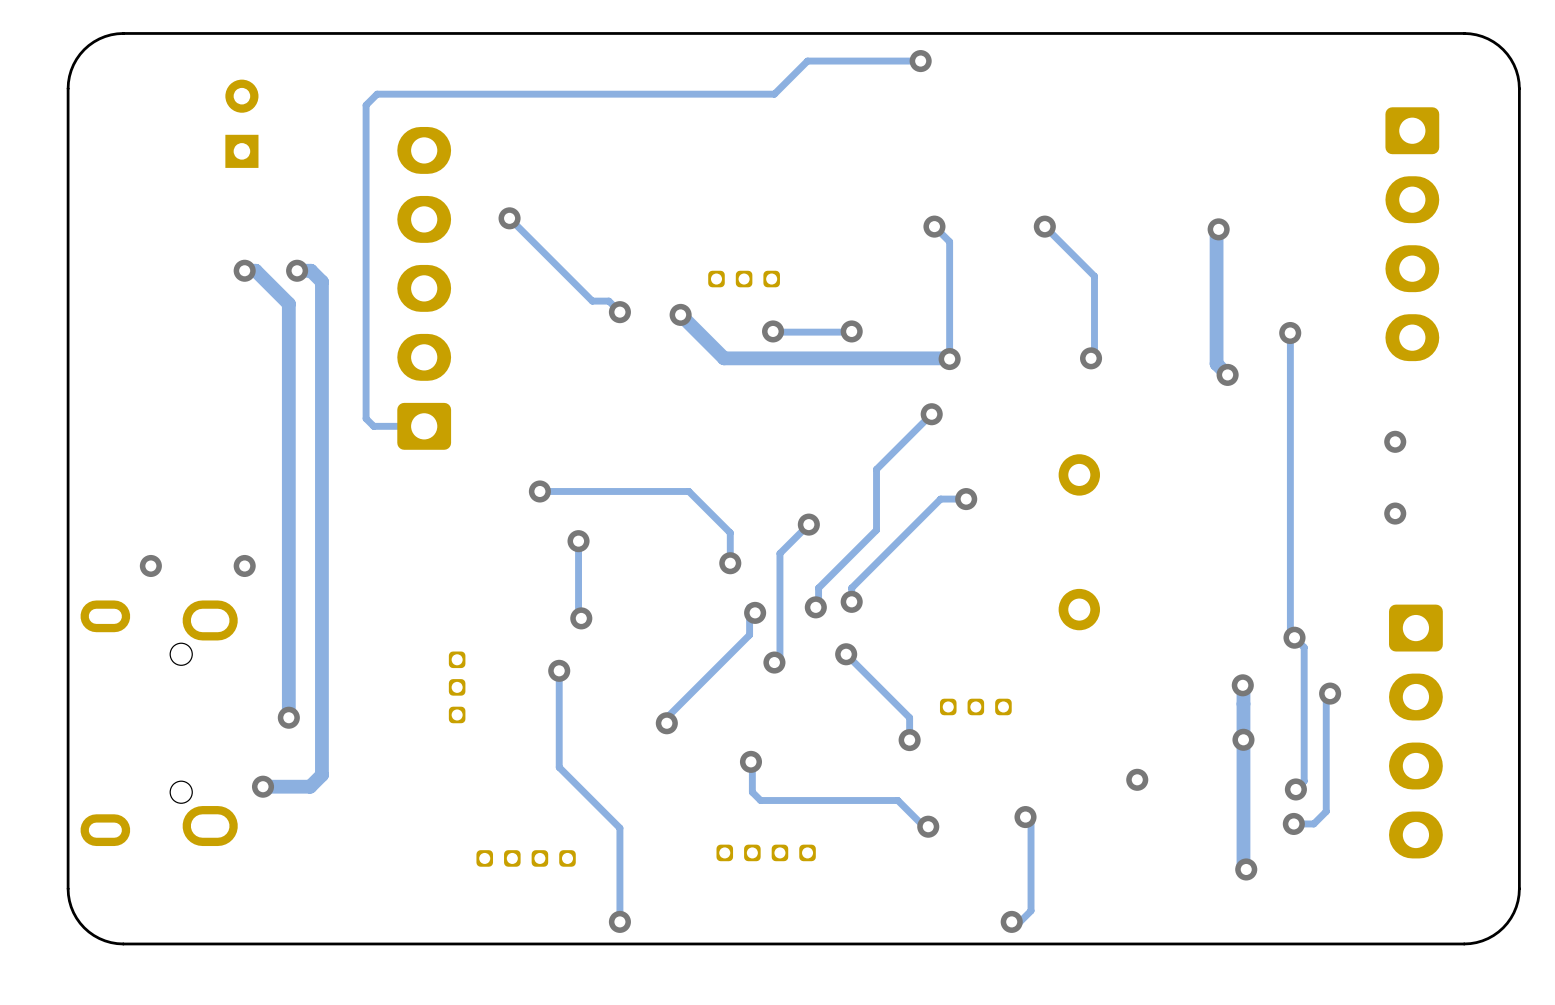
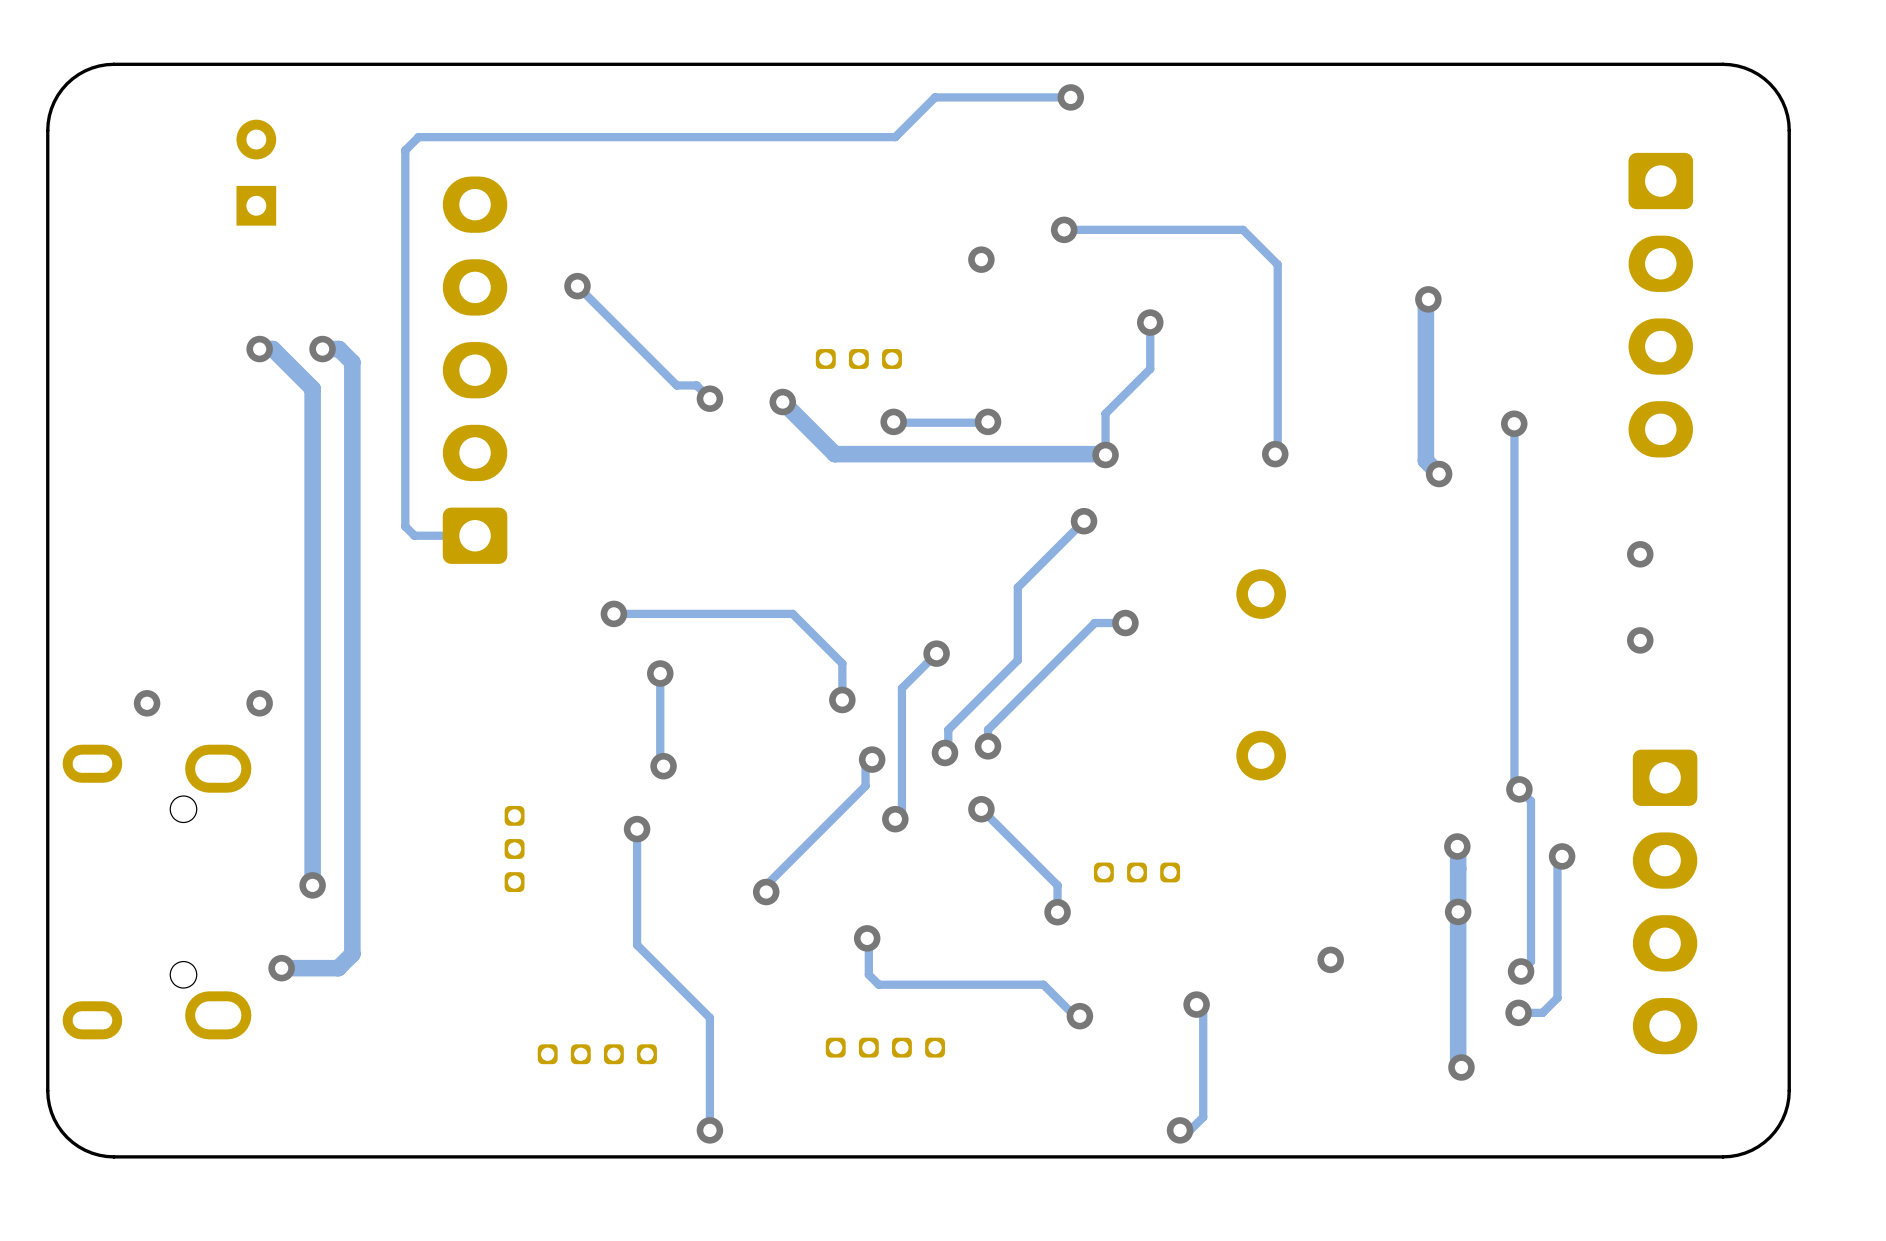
via: none -> (1064, 229)
via: none -> (981, 259)
track: (934, 226) (949, 241) (949, 324) -> (1150, 322) (1150, 368) (1105, 413)
via: (934, 226) -> none
track: (1044, 226) (1094, 276) (1093, 356) -> (1064, 229) (1242, 229) (1277, 264) (1277, 451)
via: (1044, 226) -> none
via: none -> (1150, 322)

